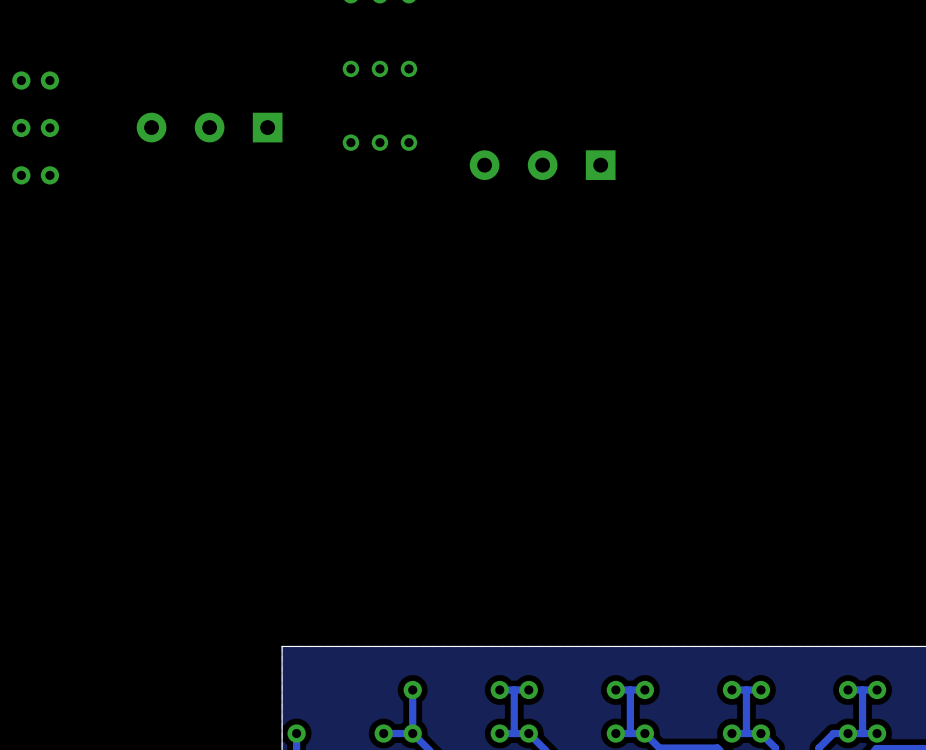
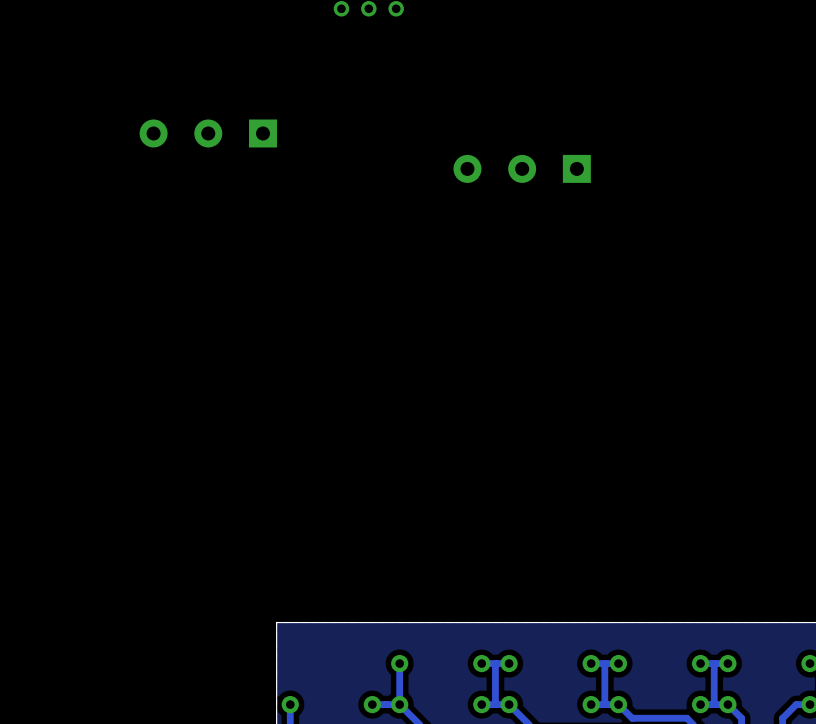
part: (379, 68) -> none
part: (35, 80) -> none
part: (35, 127) -> none
part: (379, 142) -> none
part: (35, 175) -> none

